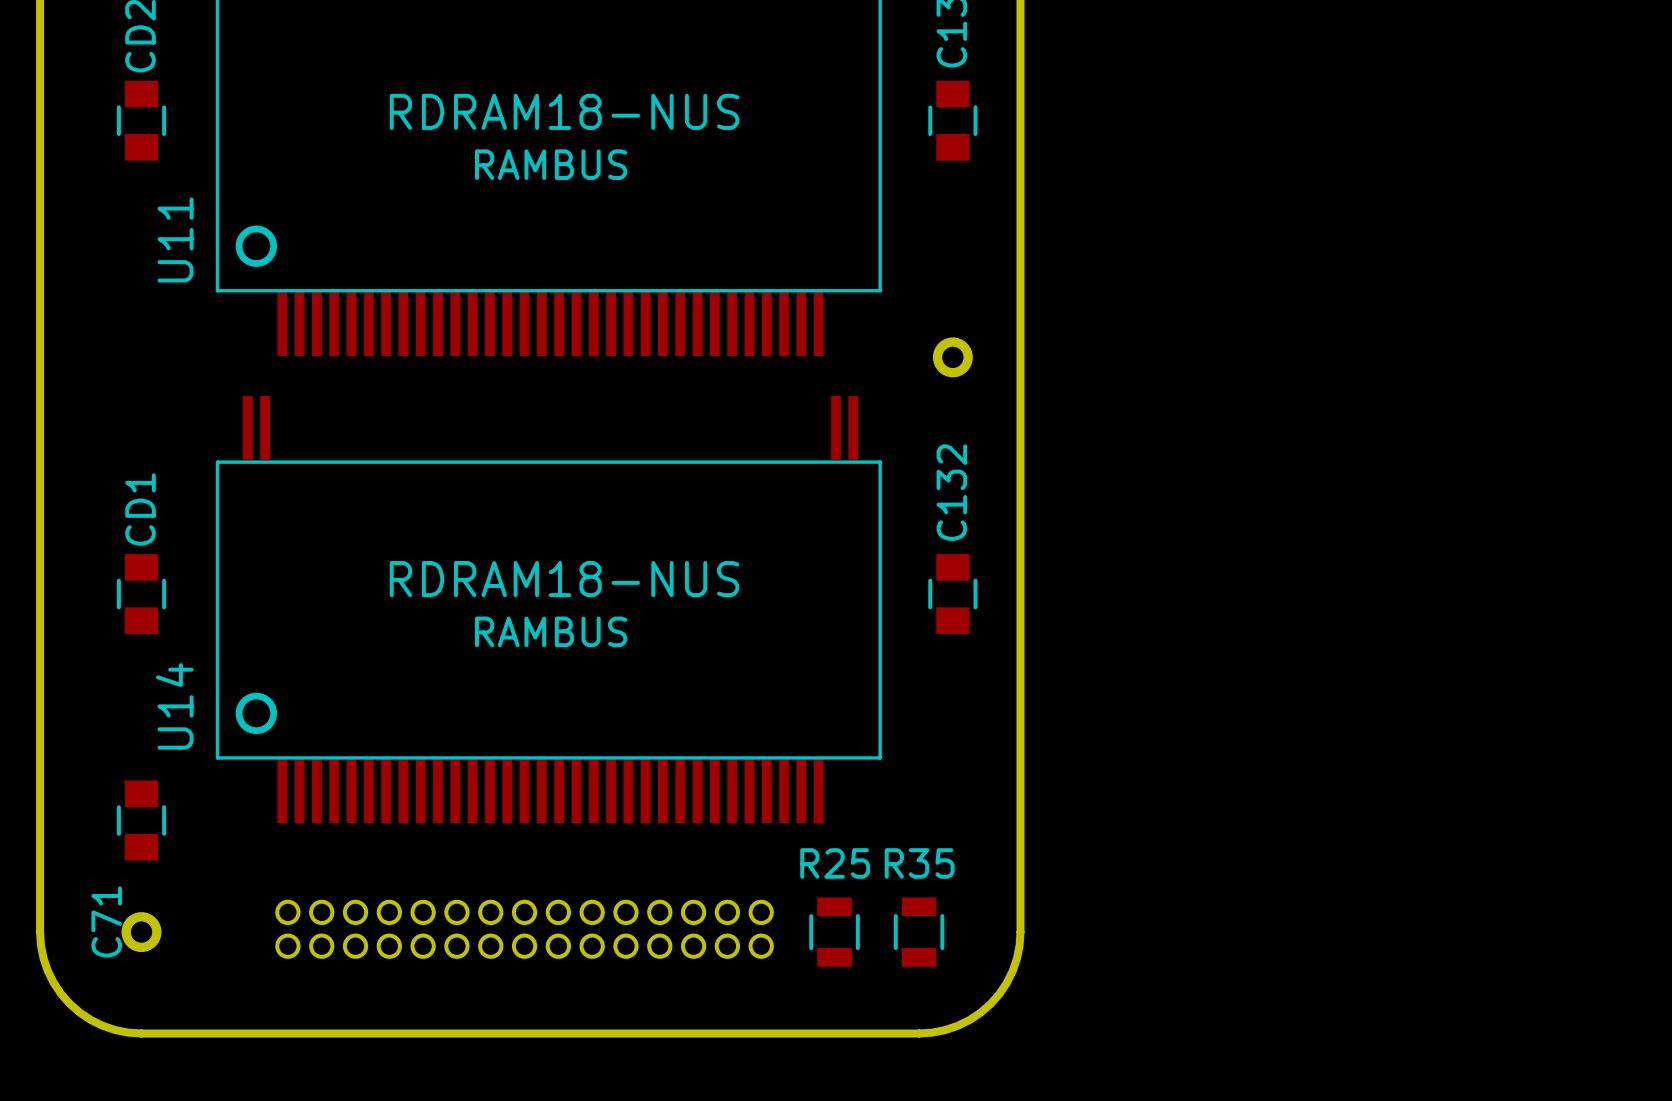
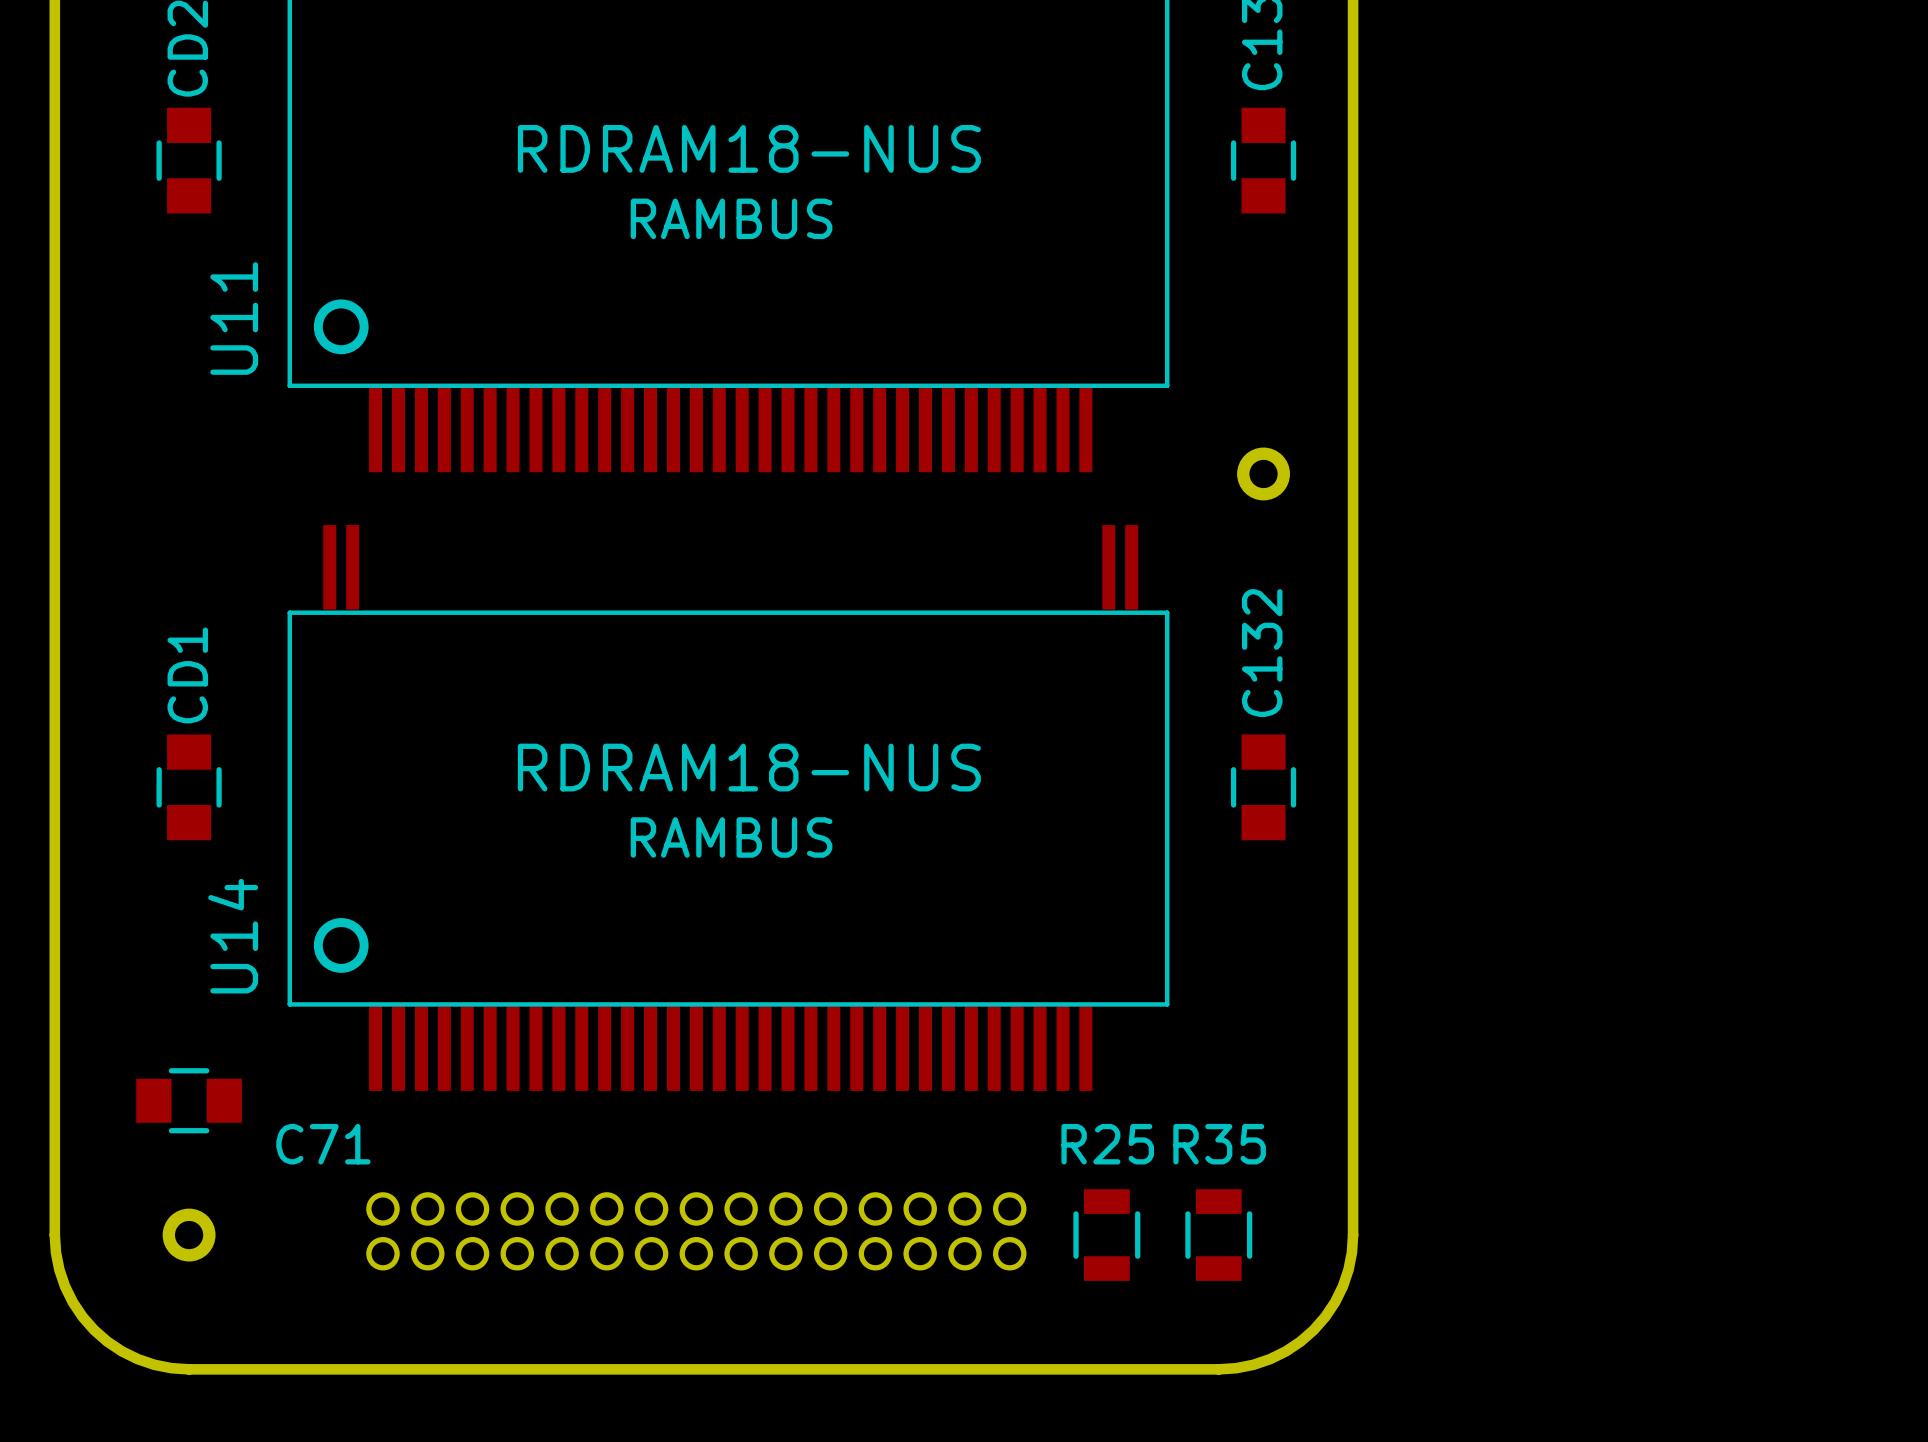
C71 rotation: 0° (141, 820) -> 90° clockwise (189, 1100)
C71 name position: C71 (106, 921) -> C71 (323, 1144)

